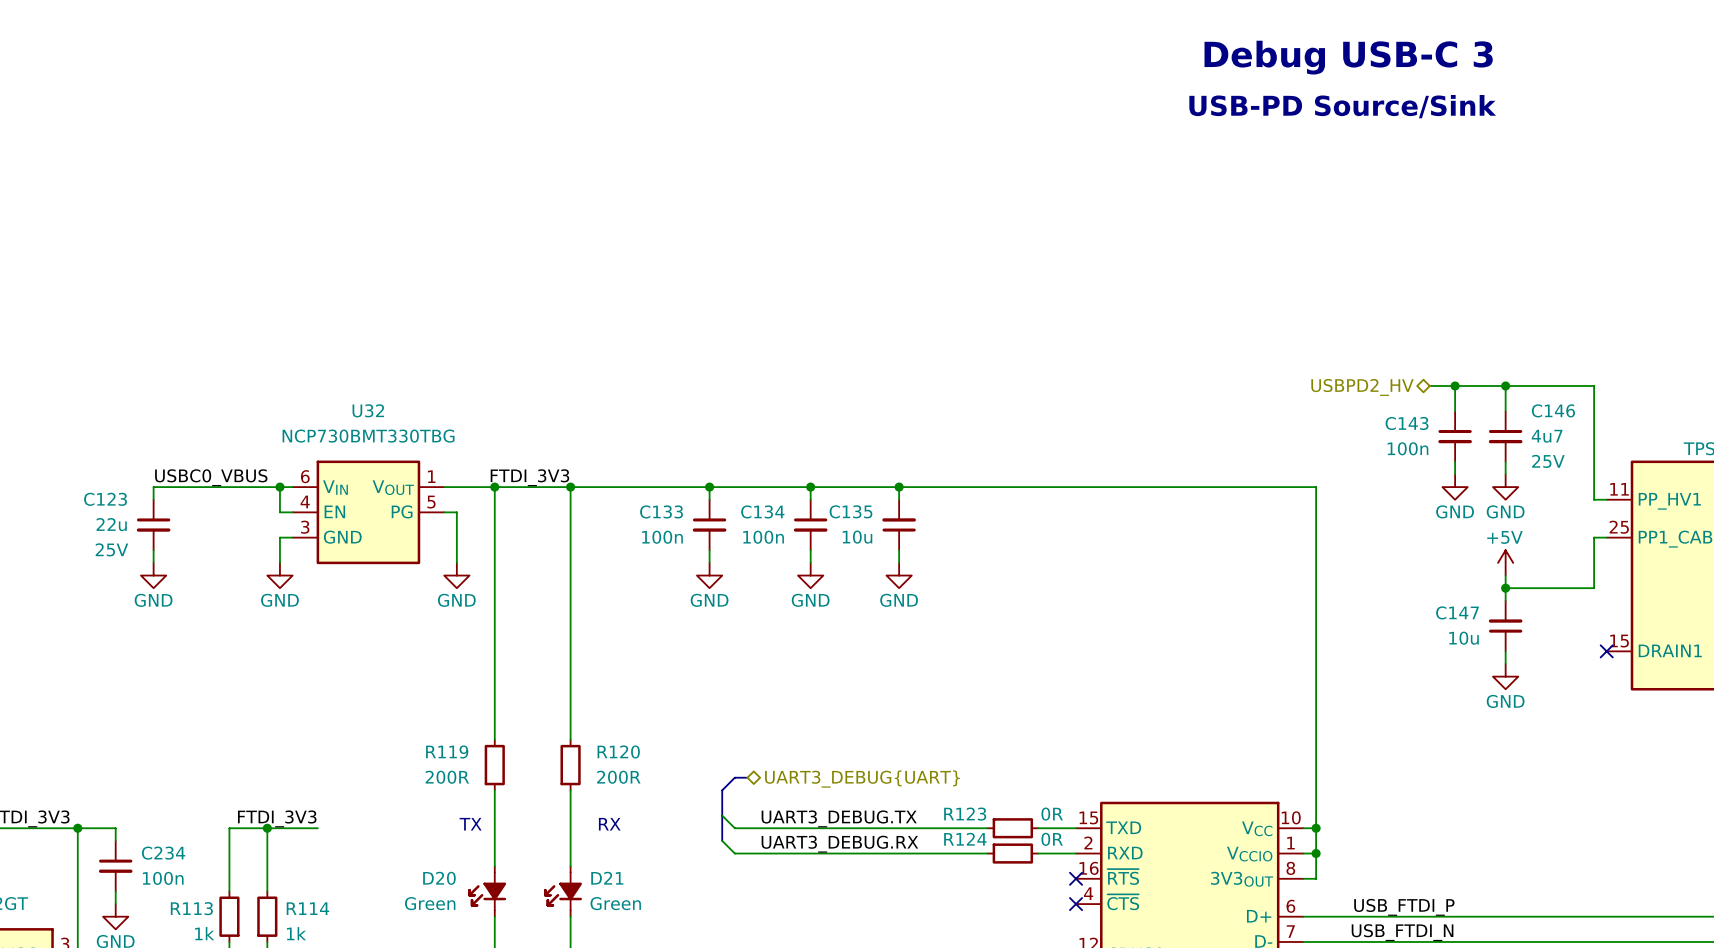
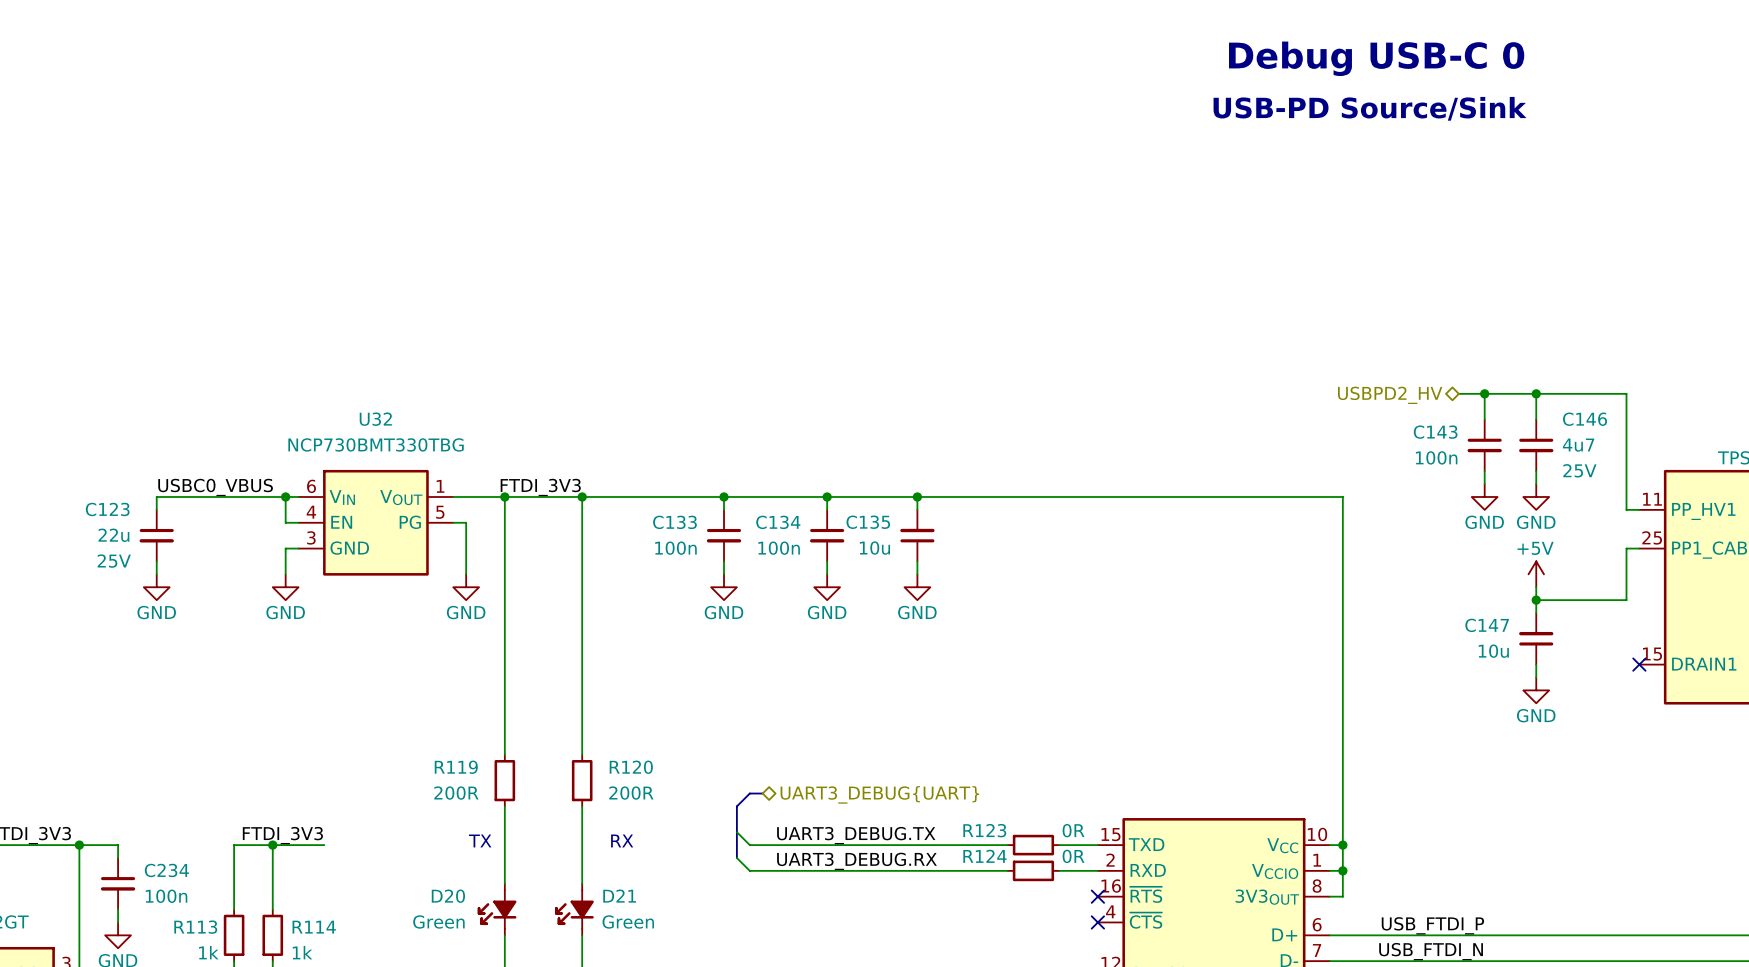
text: Debug USB-C 3 (1348, 57) -> Debug USB-C 0 (1376, 58)

